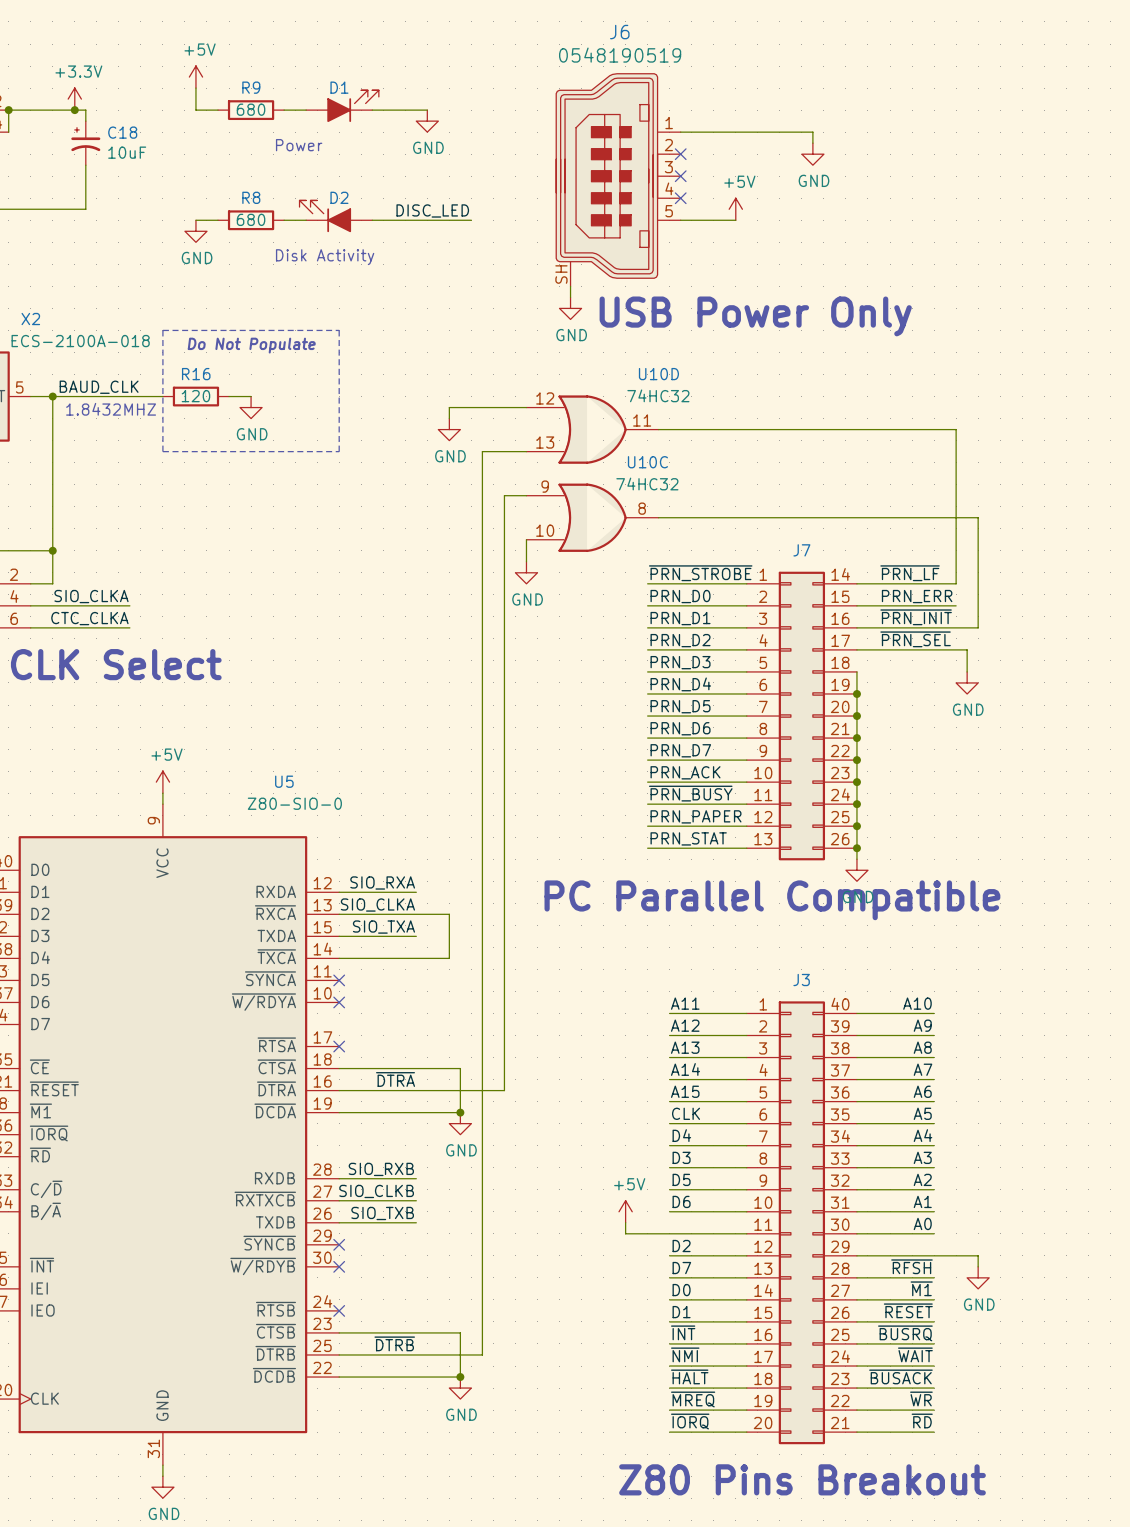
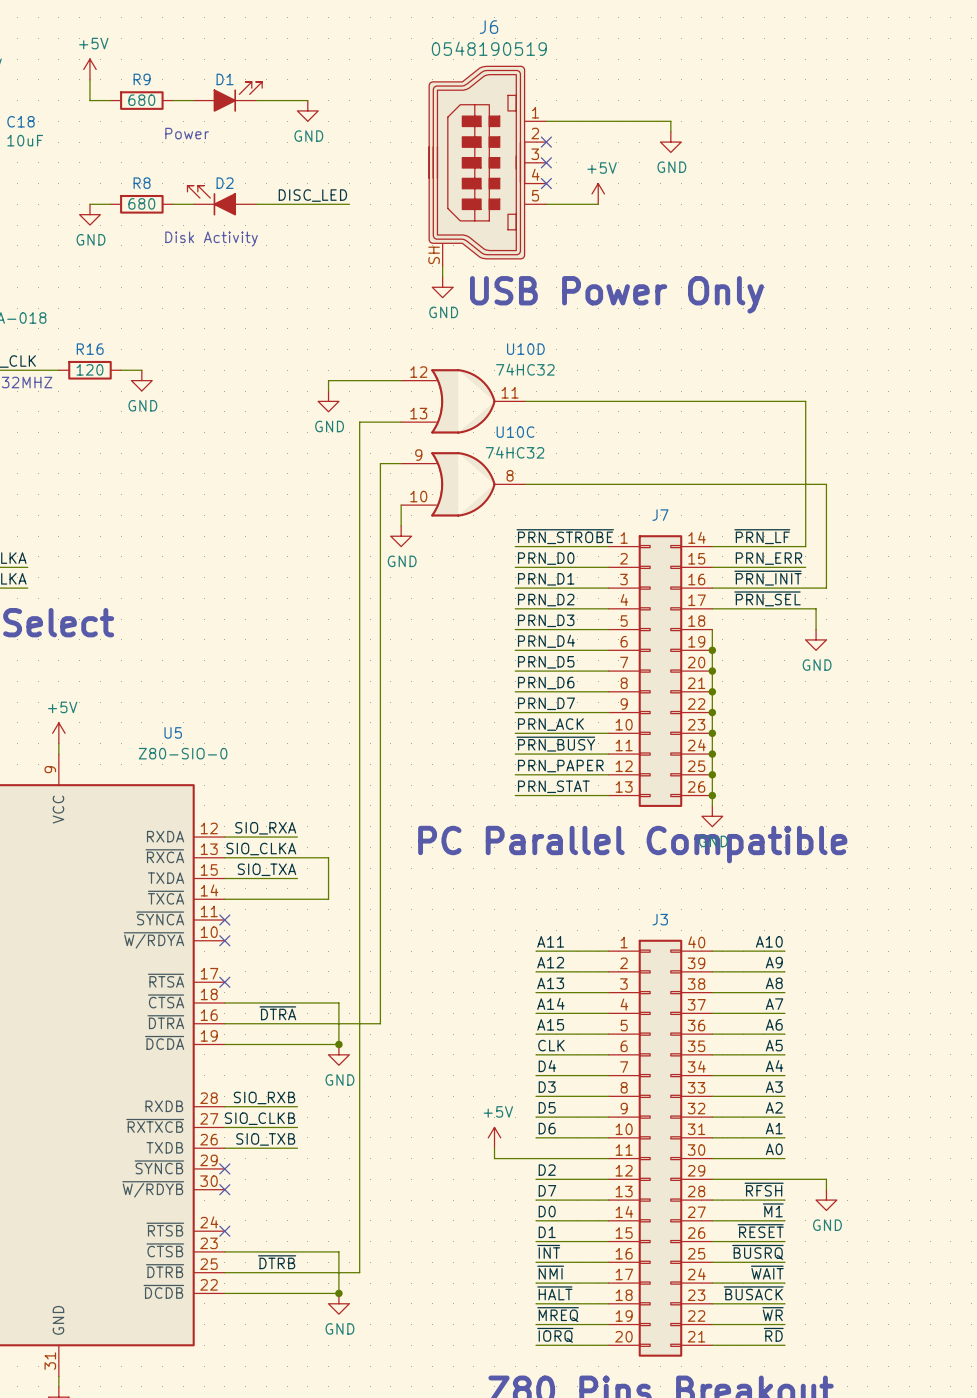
line: (162, 330) (339, 330) (339, 451) (162, 451) (162, 330) -> none
text: Do Not Populate (251, 345) -> none

